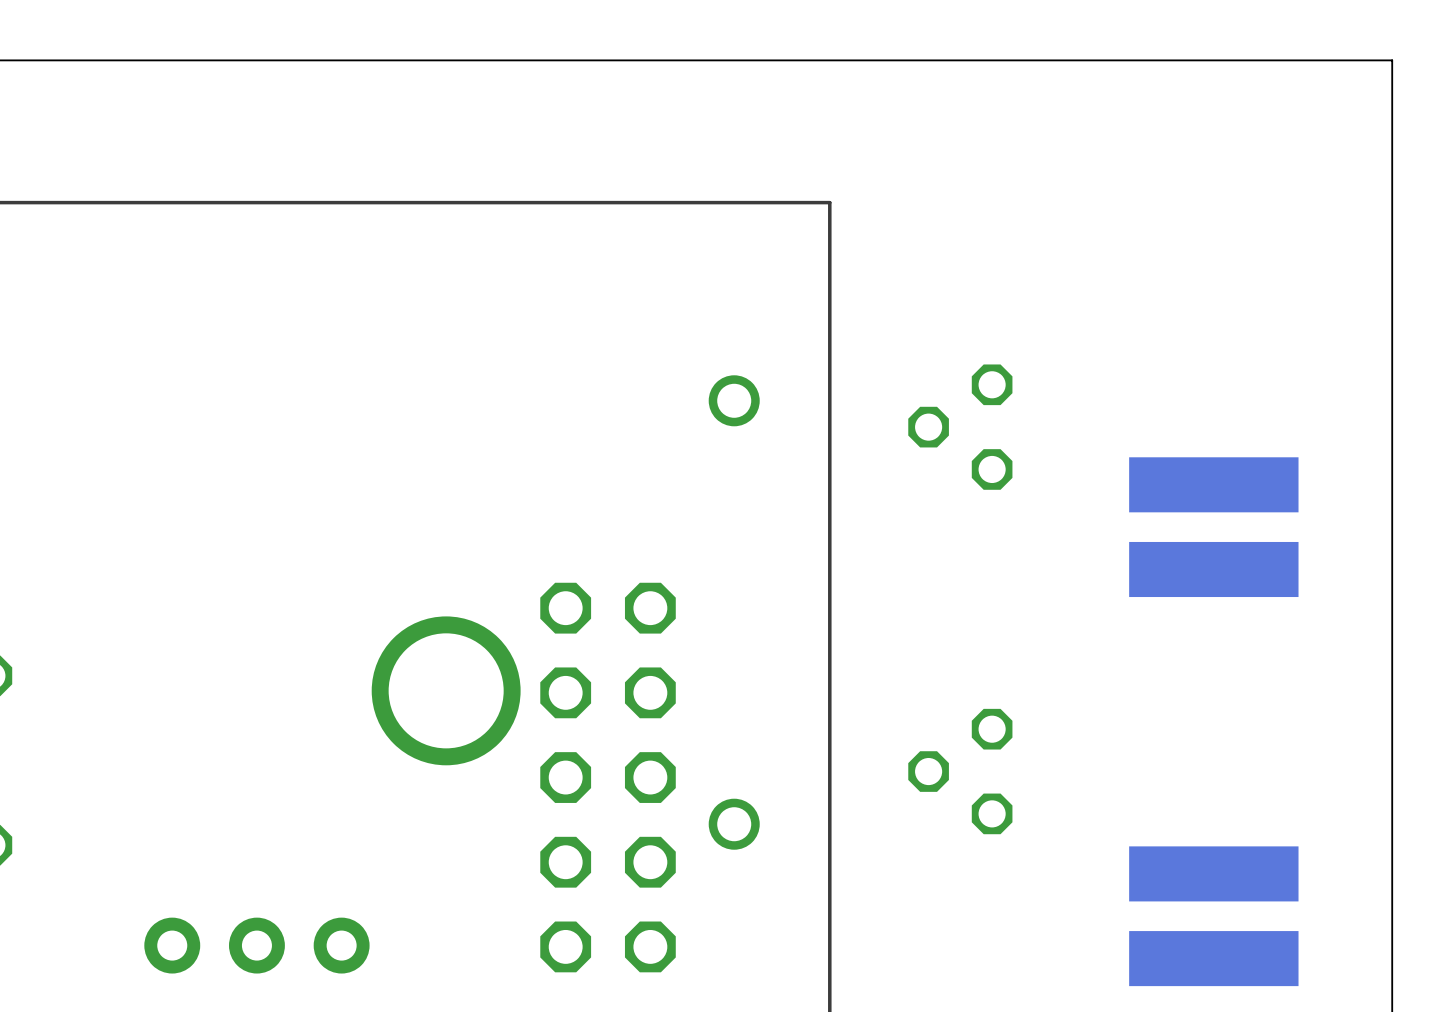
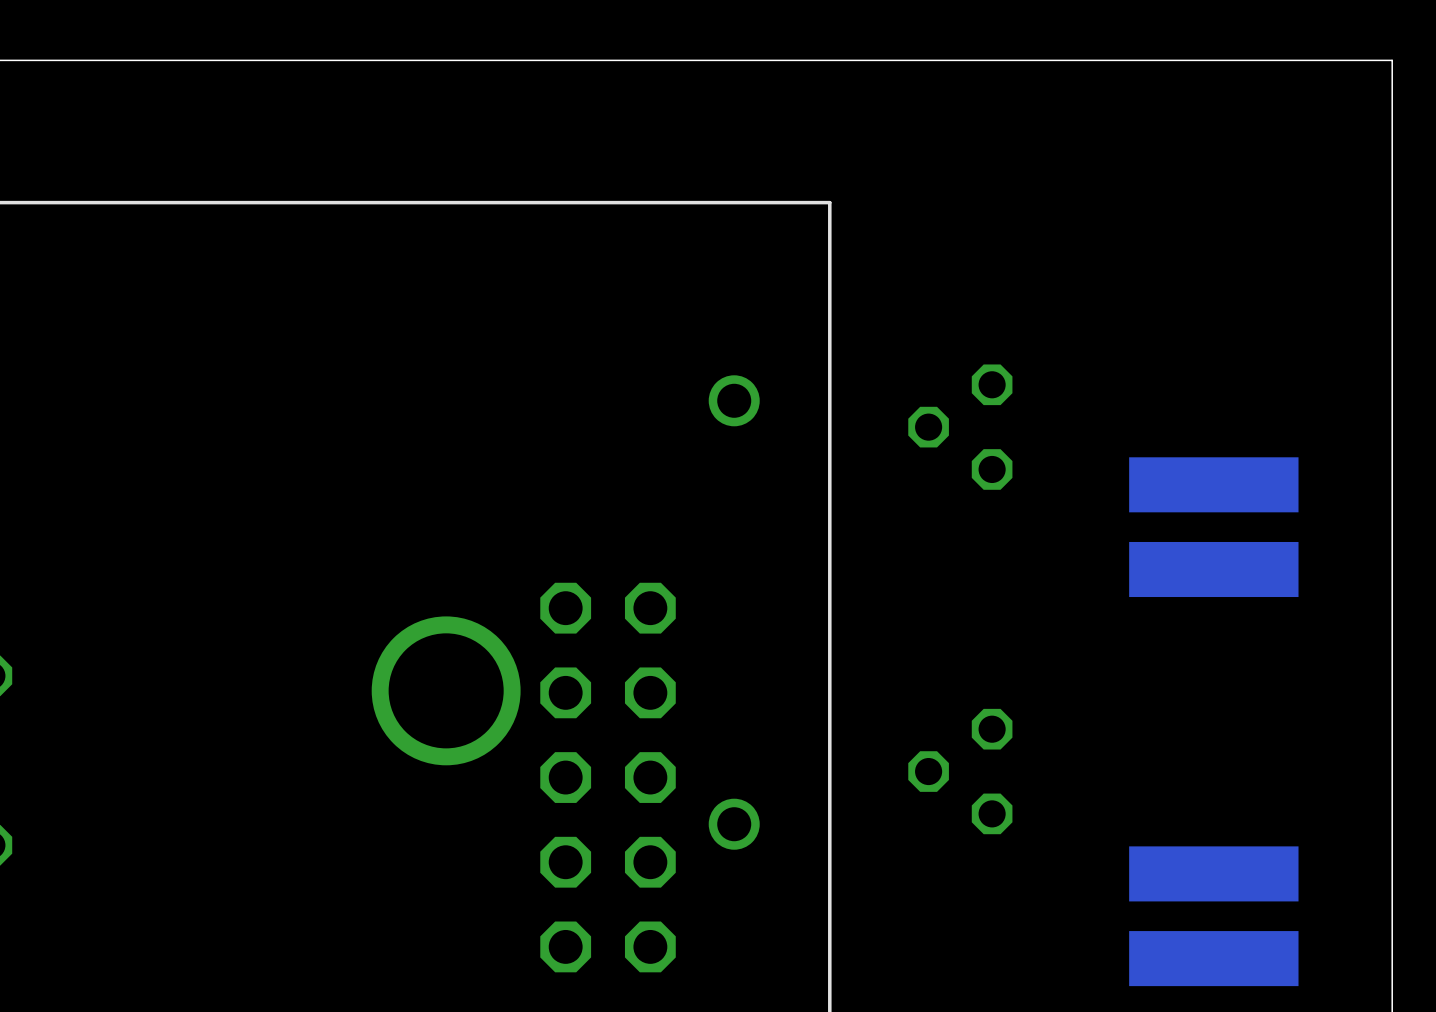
part: (256, 945) -> none

